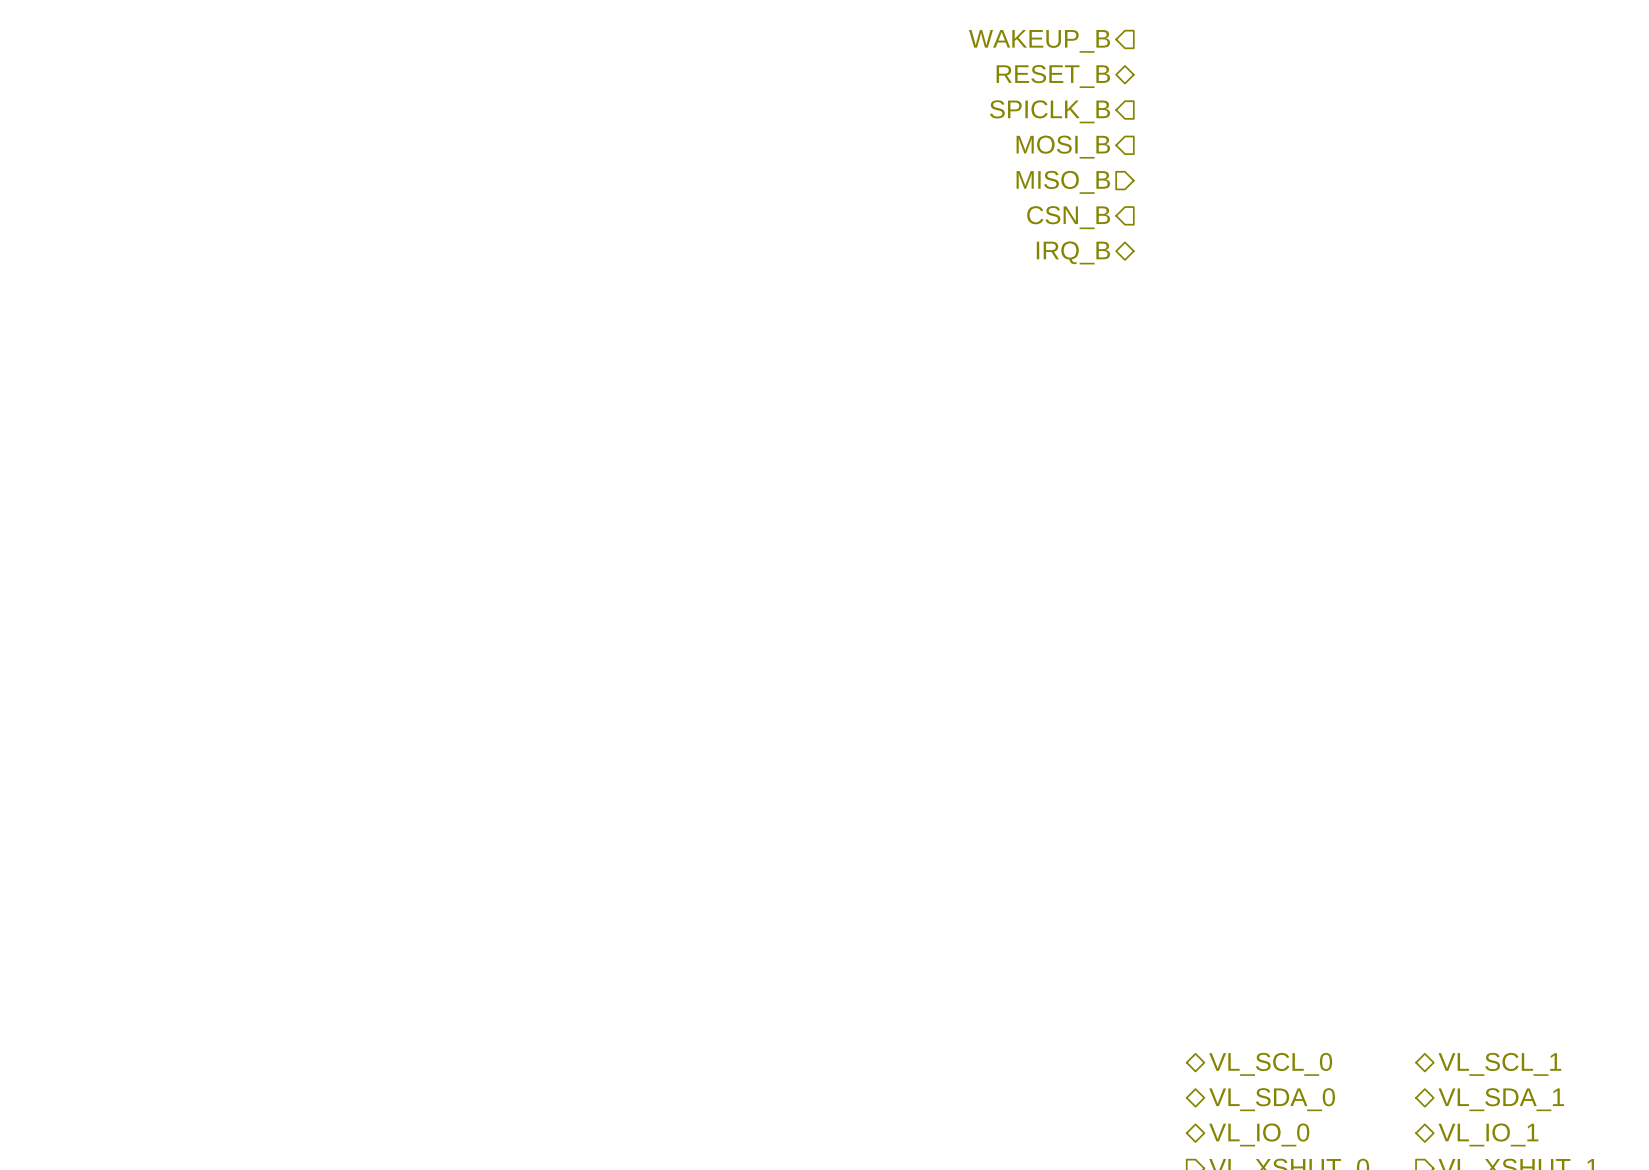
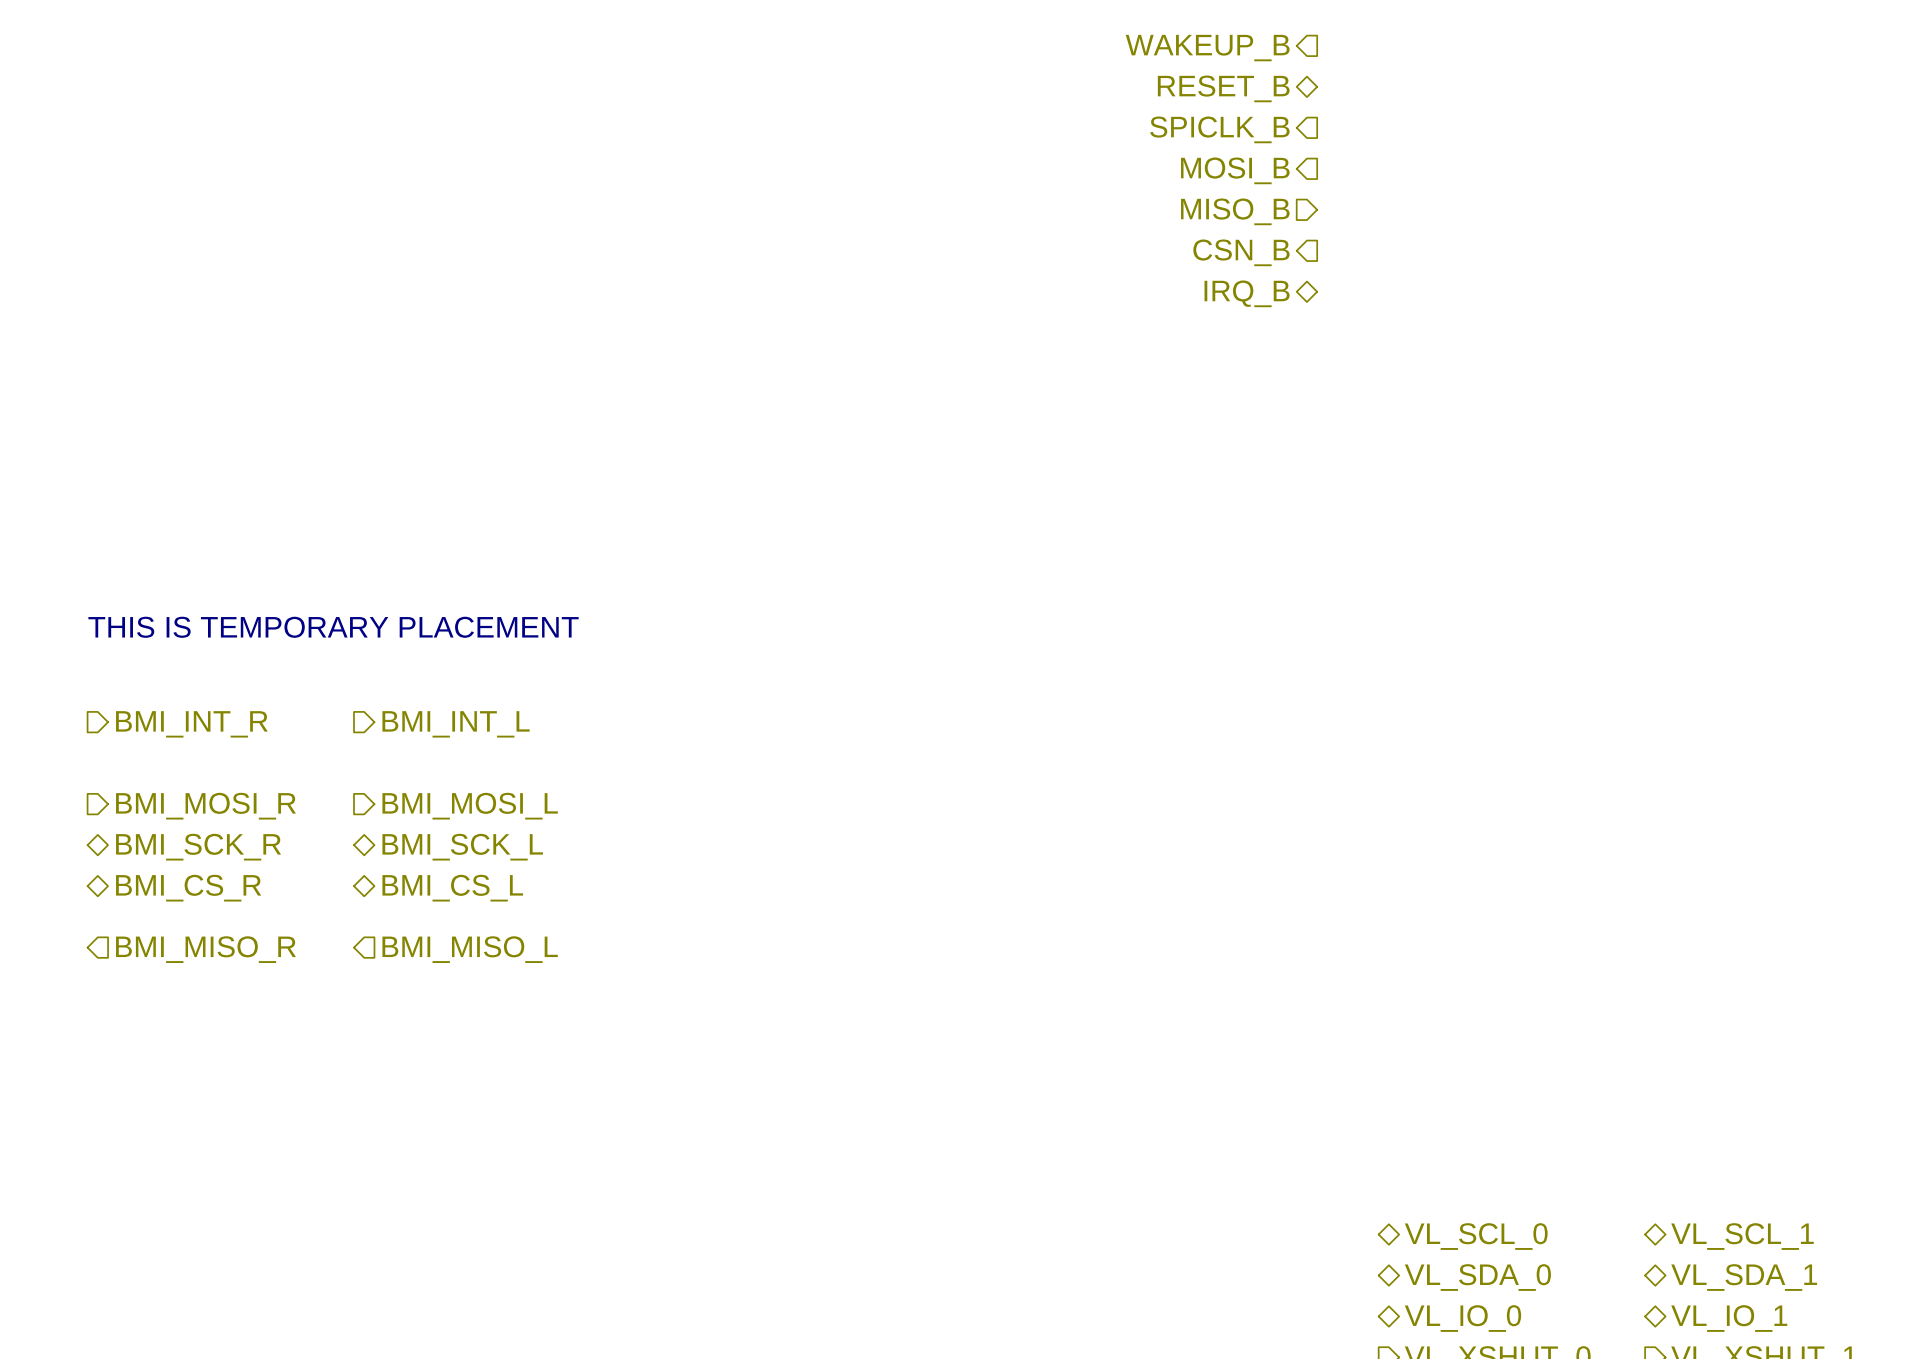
text: none -> THIS IS TEMPORARY PLACEMENT (333, 627)
hierarchical label: none -> BMI_INT_R (191, 724)
hierarchical label: none -> BMI_INT_L (456, 724)
hierarchical label: none -> BMI_MOSI_R (205, 806)
hierarchical label: none -> BMI_MOSI_L (470, 806)
hierarchical label: none -> BMI_SCK_R (198, 847)
hierarchical label: none -> BMI_SCK_L (462, 847)
hierarchical label: none -> BMI_CS_R (188, 888)
hierarchical label: none -> BMI_CS_L (452, 888)
hierarchical label: none -> BMI_MISO_R (205, 949)
hierarchical label: none -> BMI_MISO_L (470, 949)

